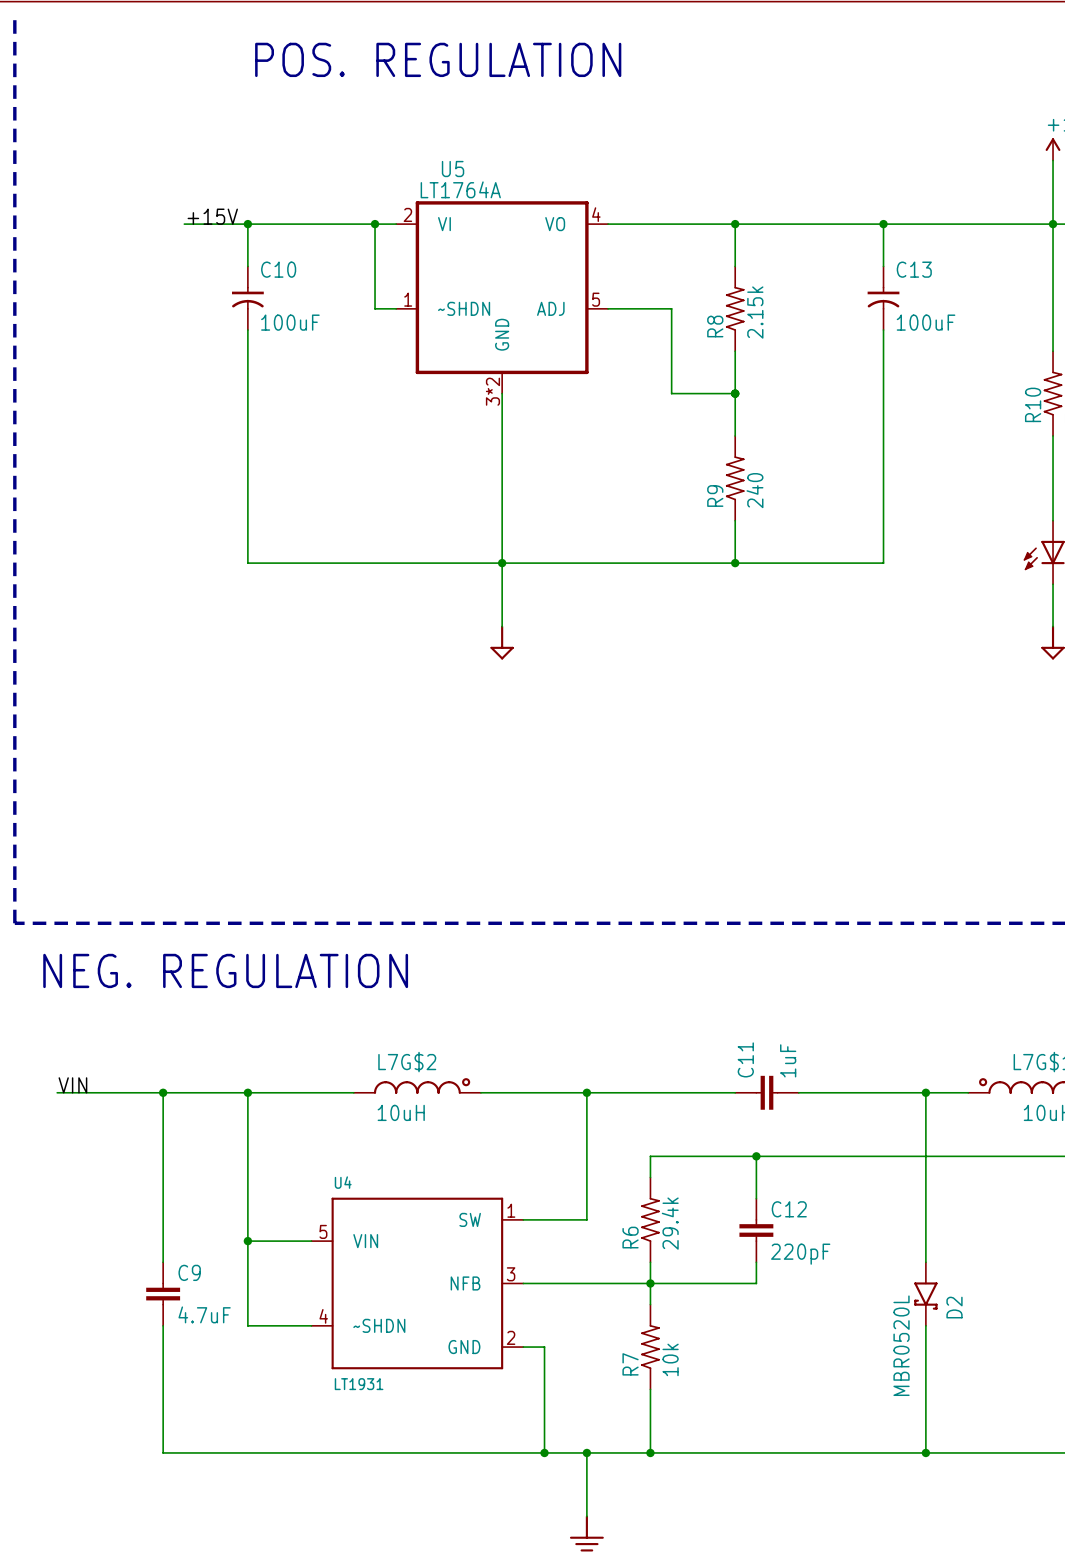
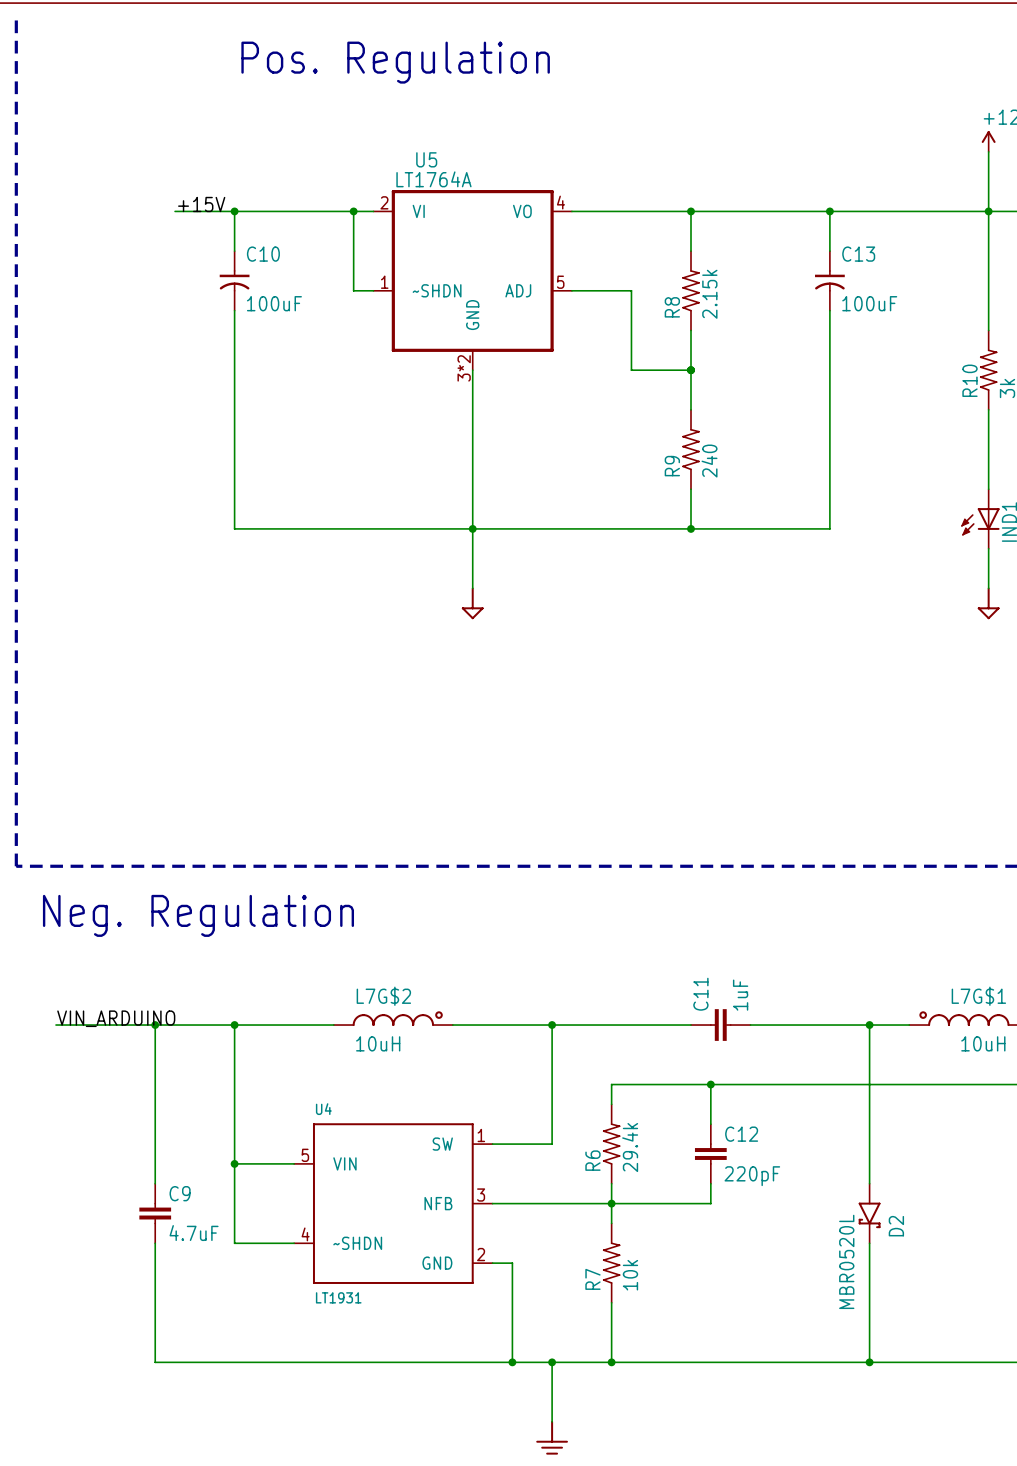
text: POS. REGULATION (438, 59) -> Pos. Regulation (395, 62)
text: NEG. REGULATION (225, 970) -> Neg. Regulation (198, 915)
label: VIN (72, 1085) -> VIN_ARDUINO (116, 1018)

